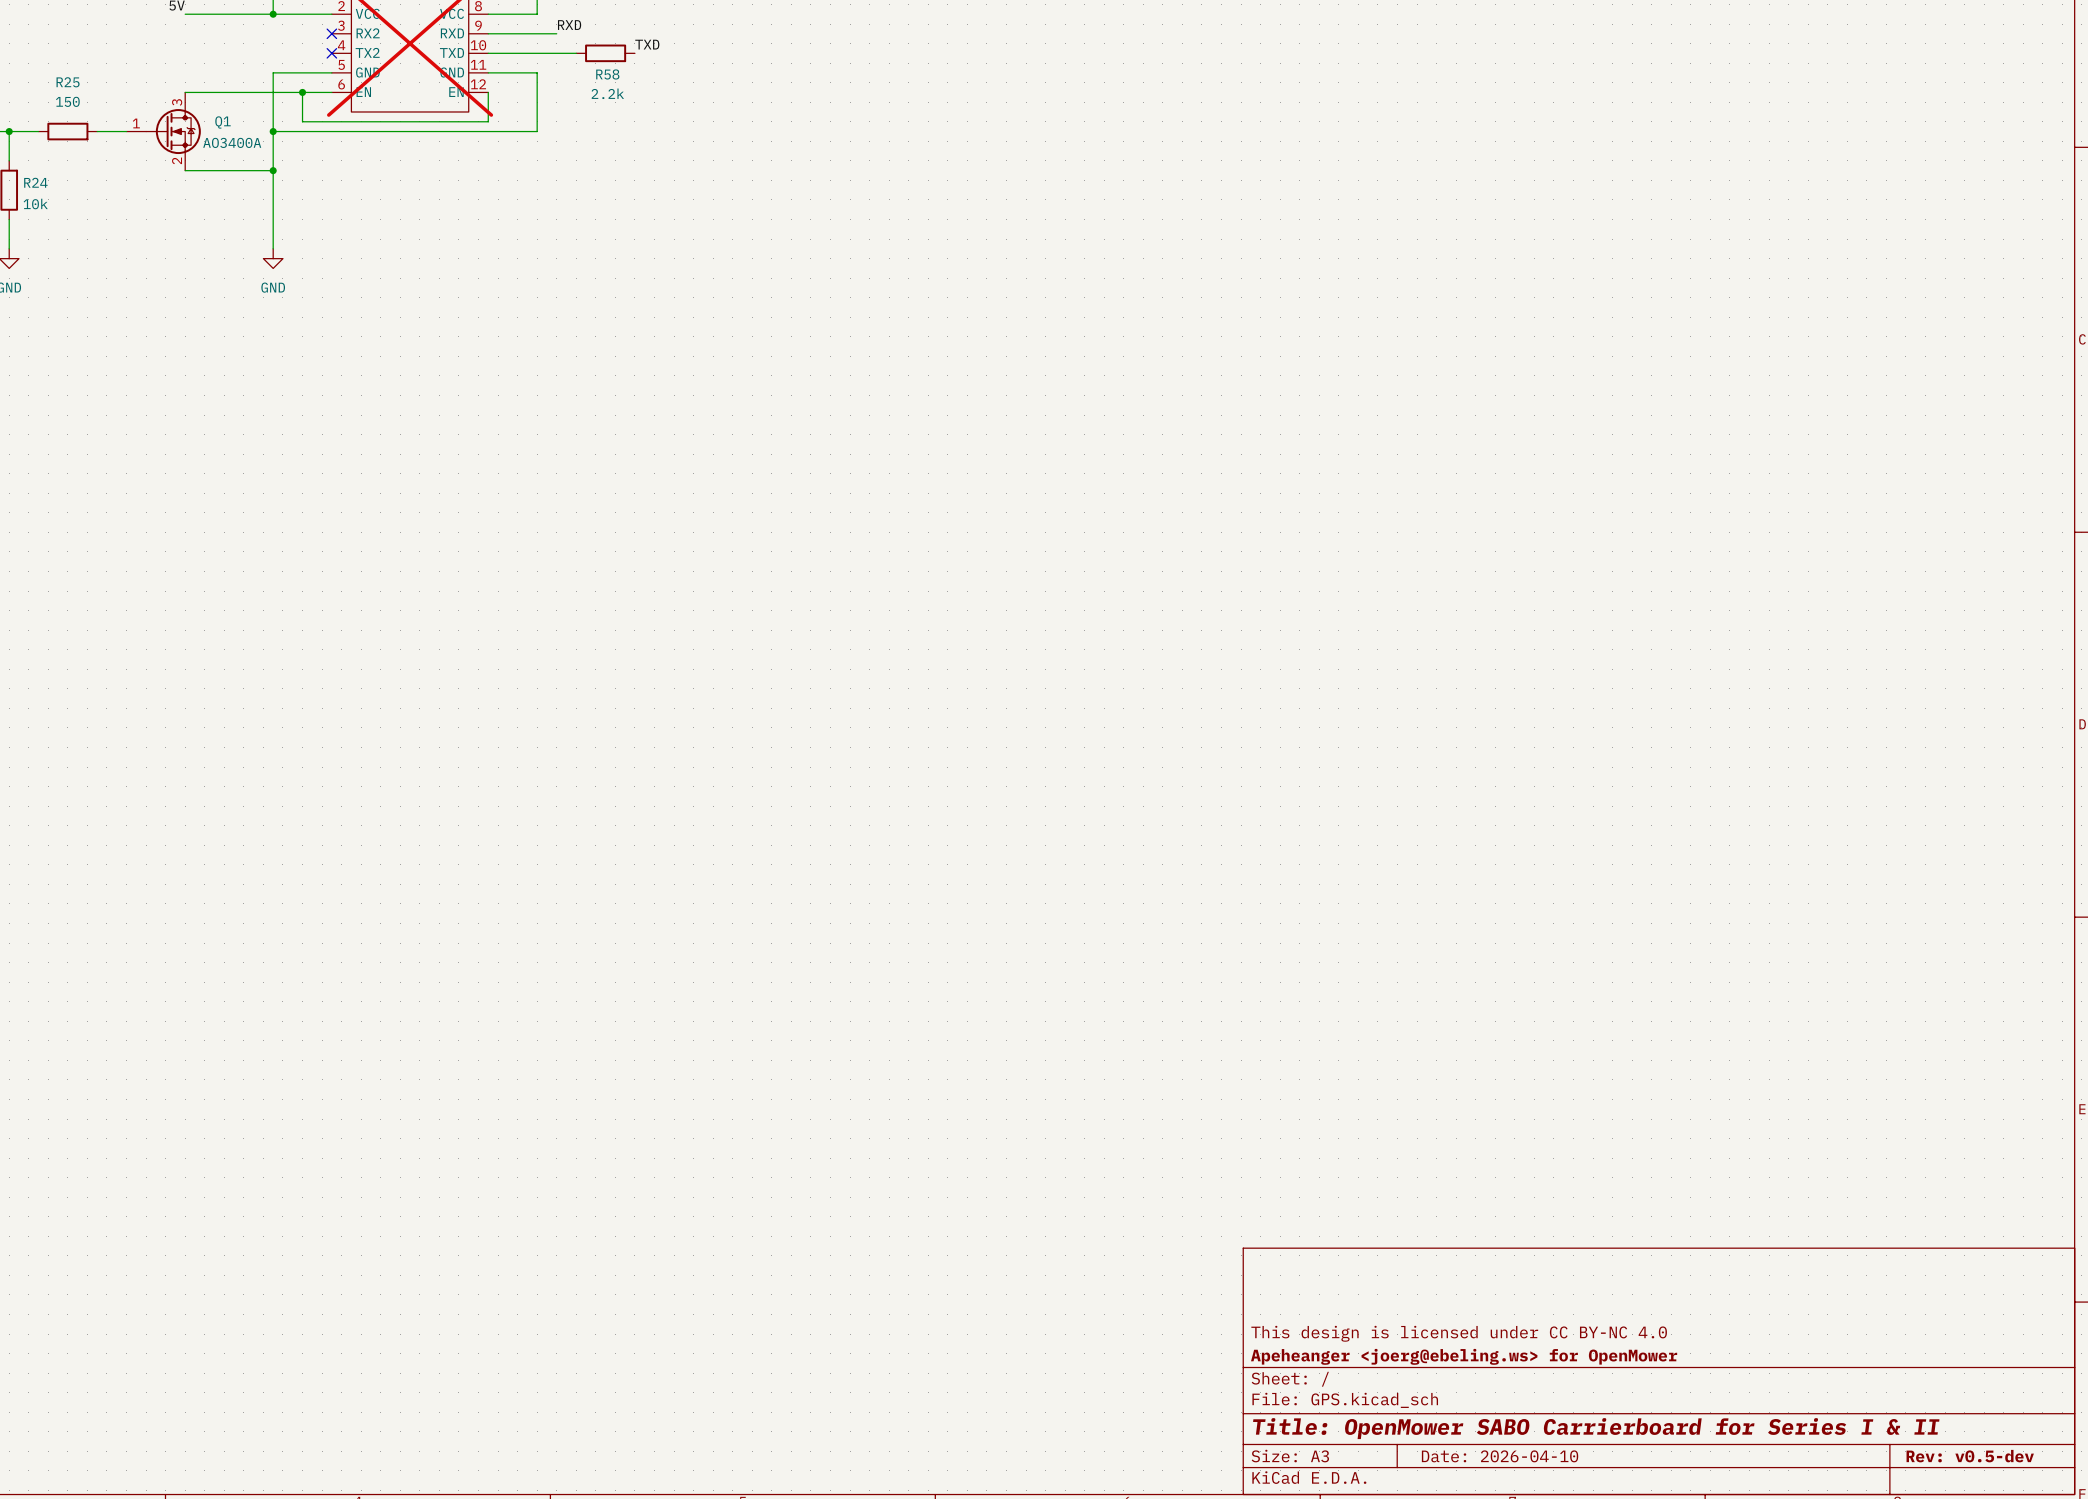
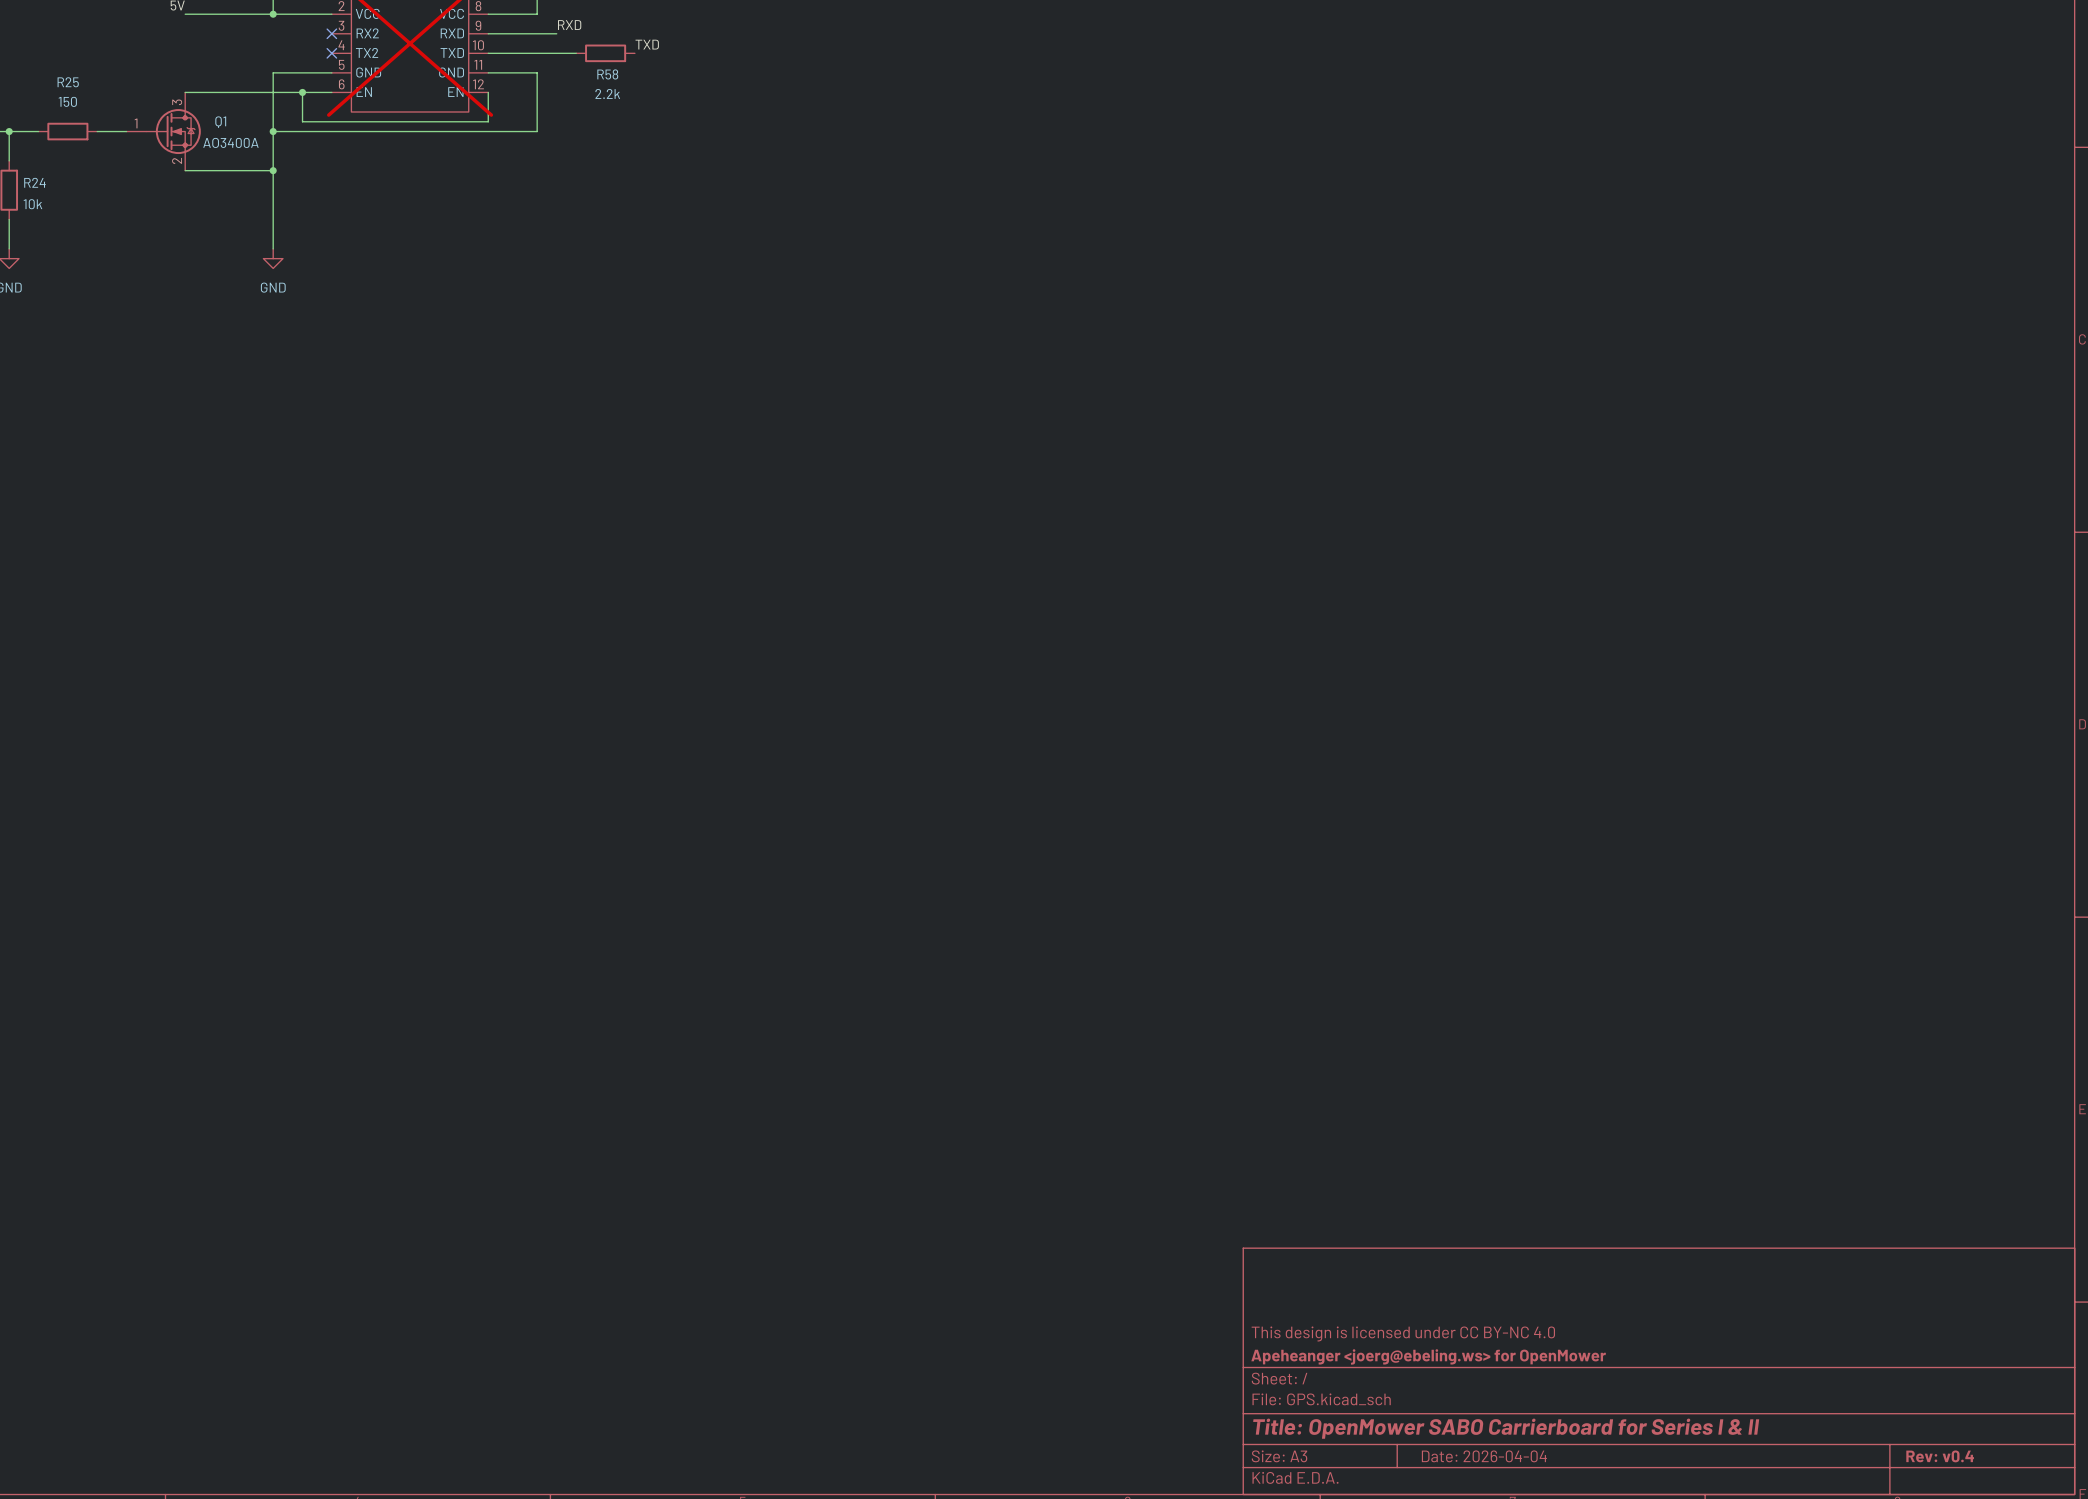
title block: Date: 2026-04-10 (1500, 1456) -> Date: 2026-04-04 (1484, 1456)
title block: Rev: v0.5-dev (1970, 1456) -> Rev: v0.4 (1940, 1456)

